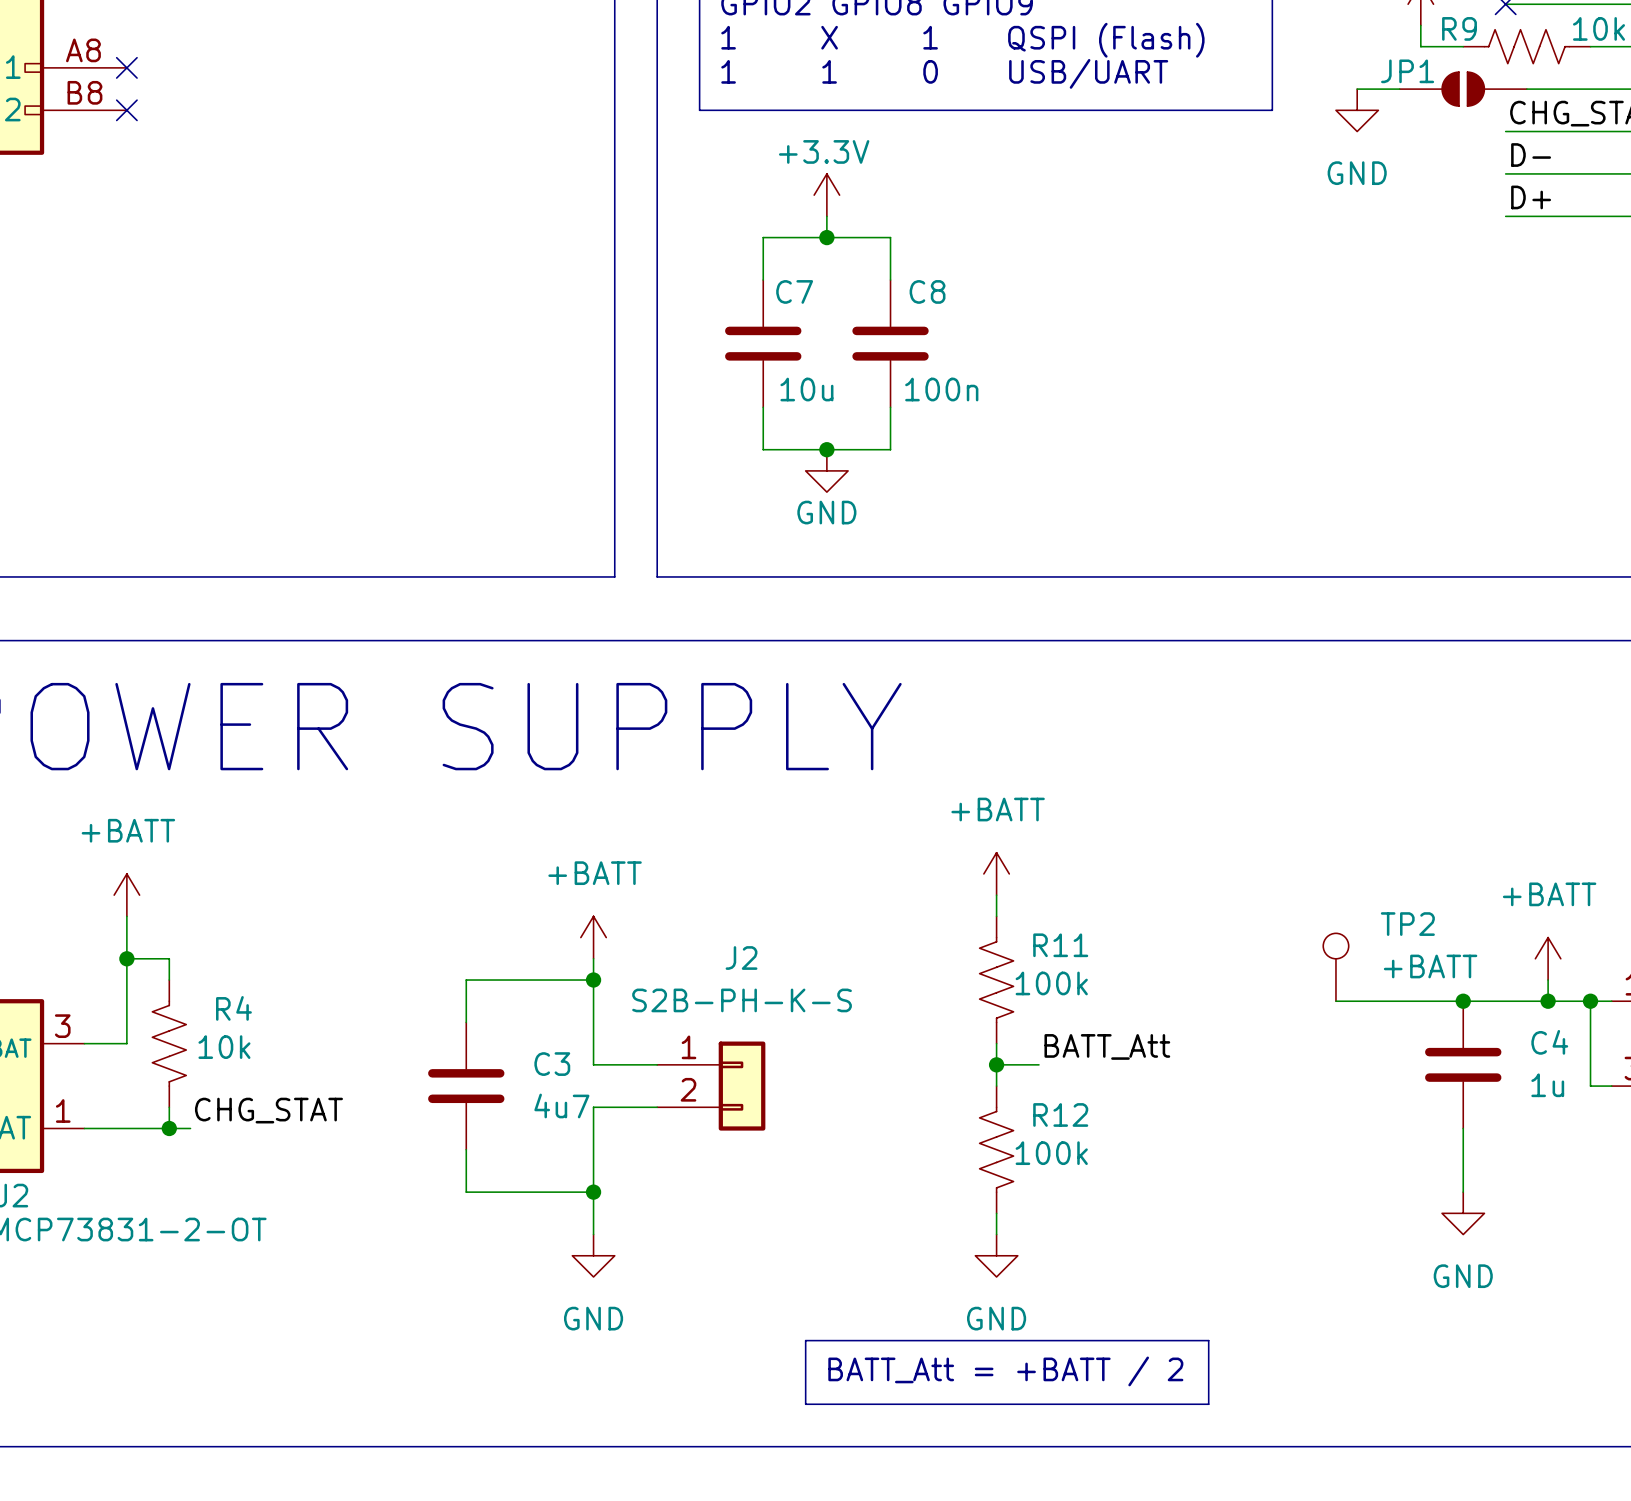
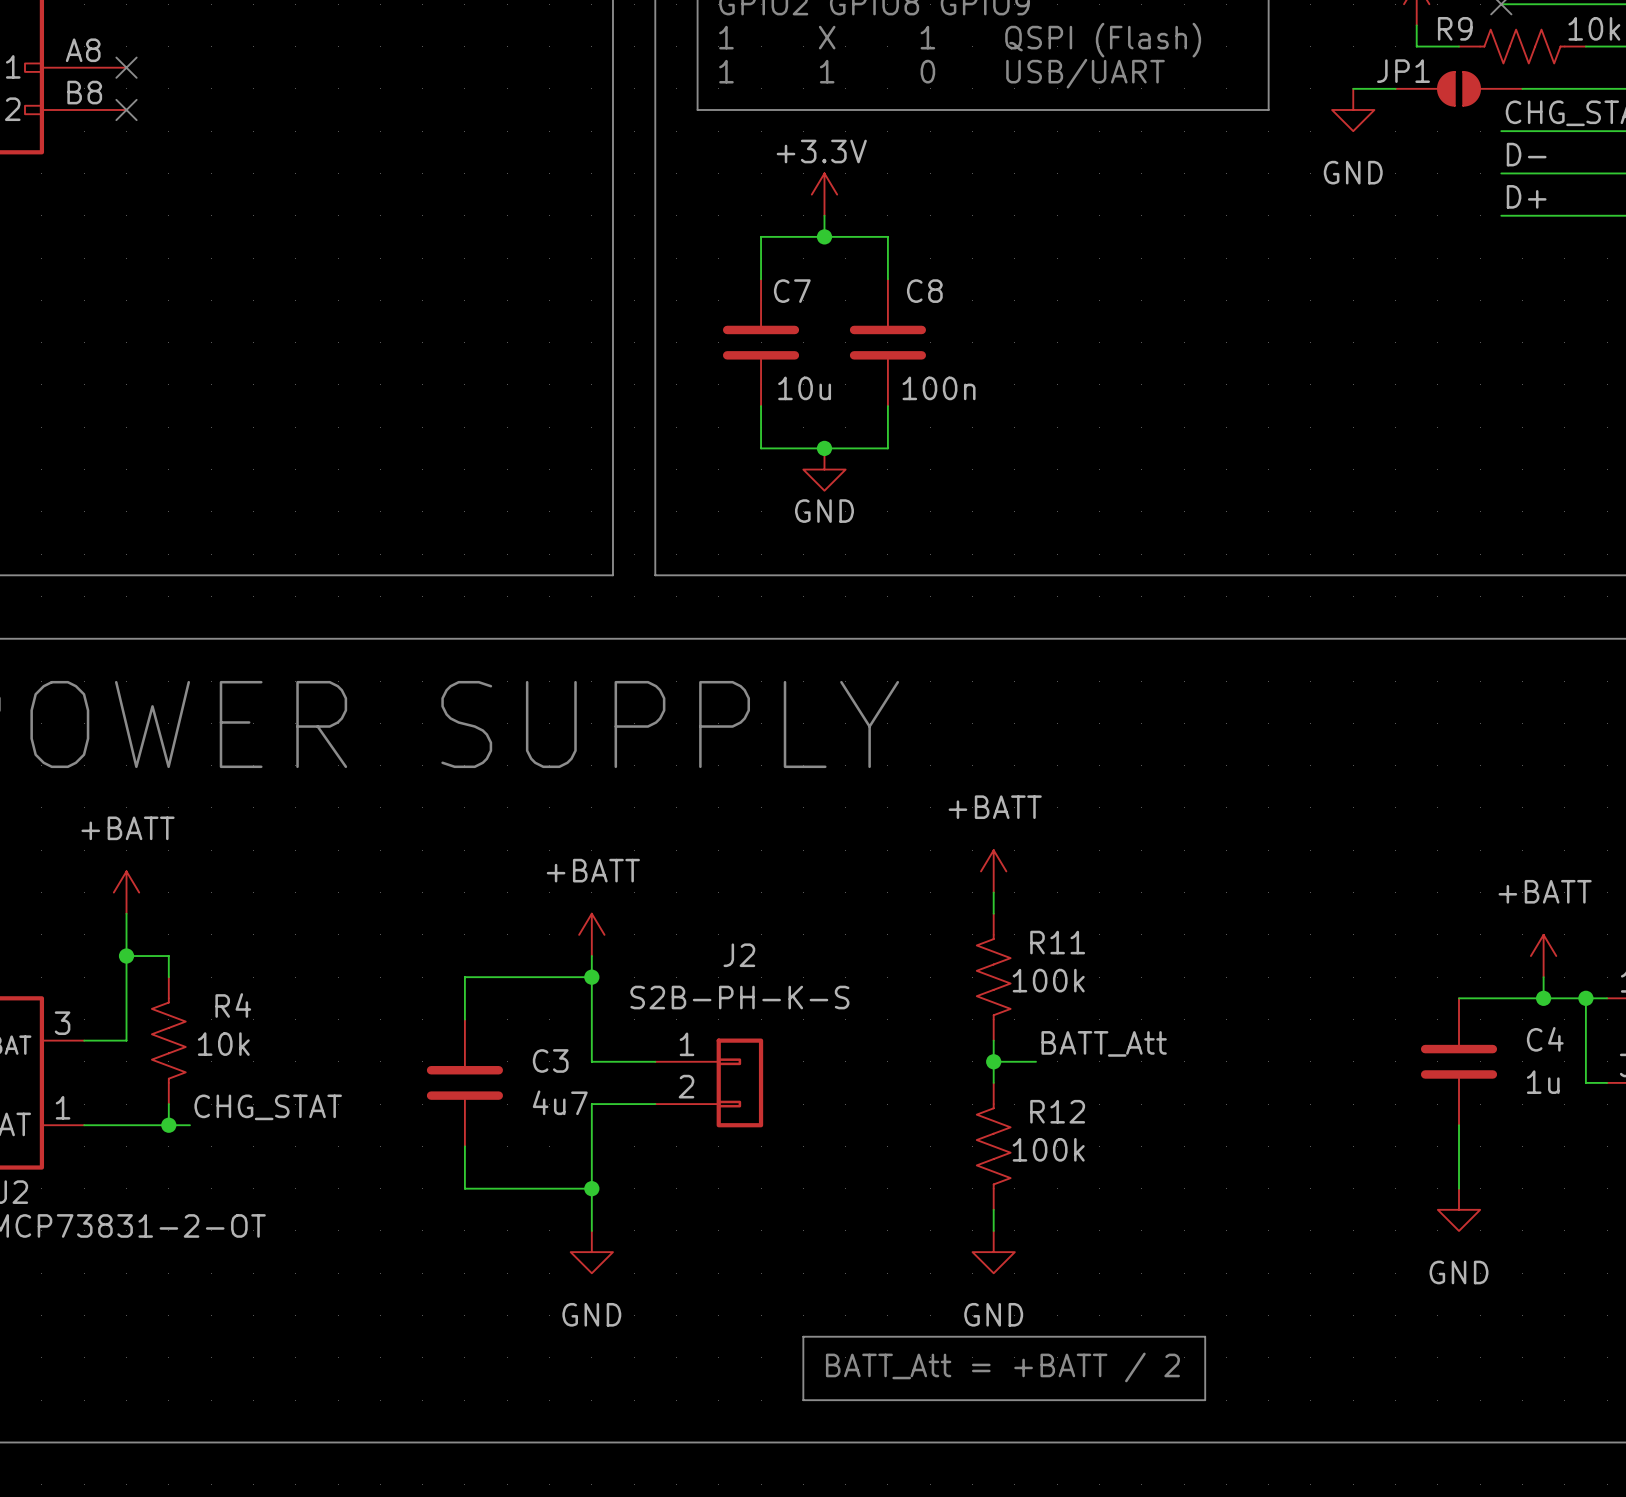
TP2: +BATT (1335, 967) -> none
wire: (1335, 1001) (1463, 1001) -> none
junction: (1463, 1001) -> none

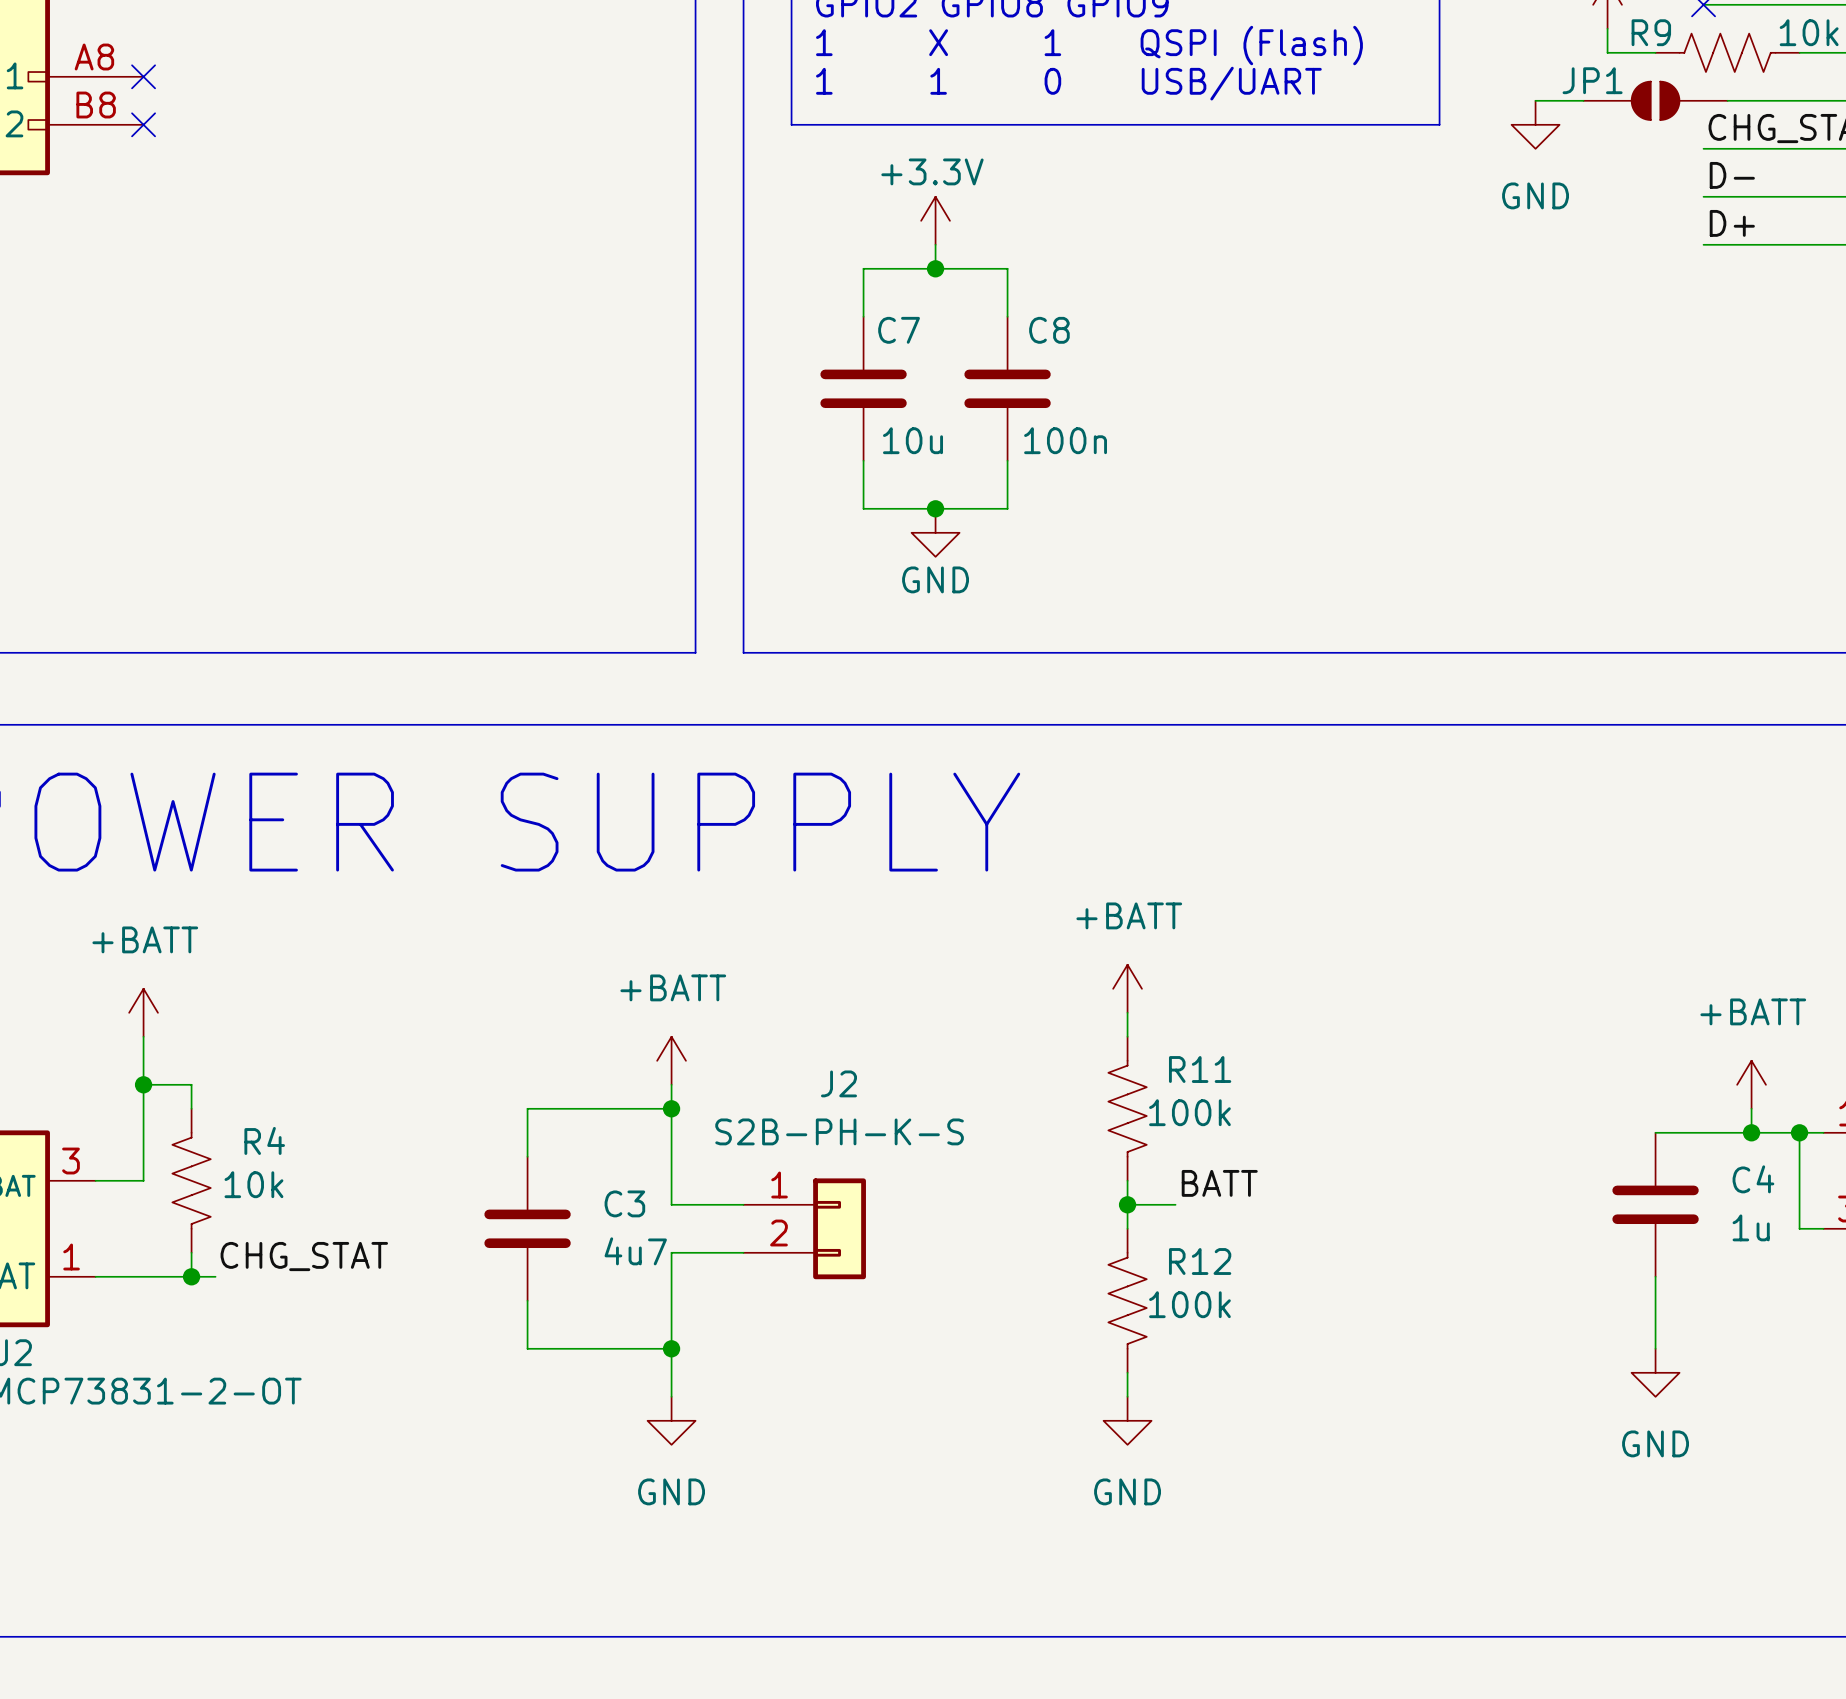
label: BATT_Att (1104, 1043) -> BATT (1219, 1183)
line: (803, 1336) (1205, 1336) (1205, 1400) (803, 1400) (803, 1336) -> none
text: BATT_Att = +BATT / 2 (1002, 1367) -> none

